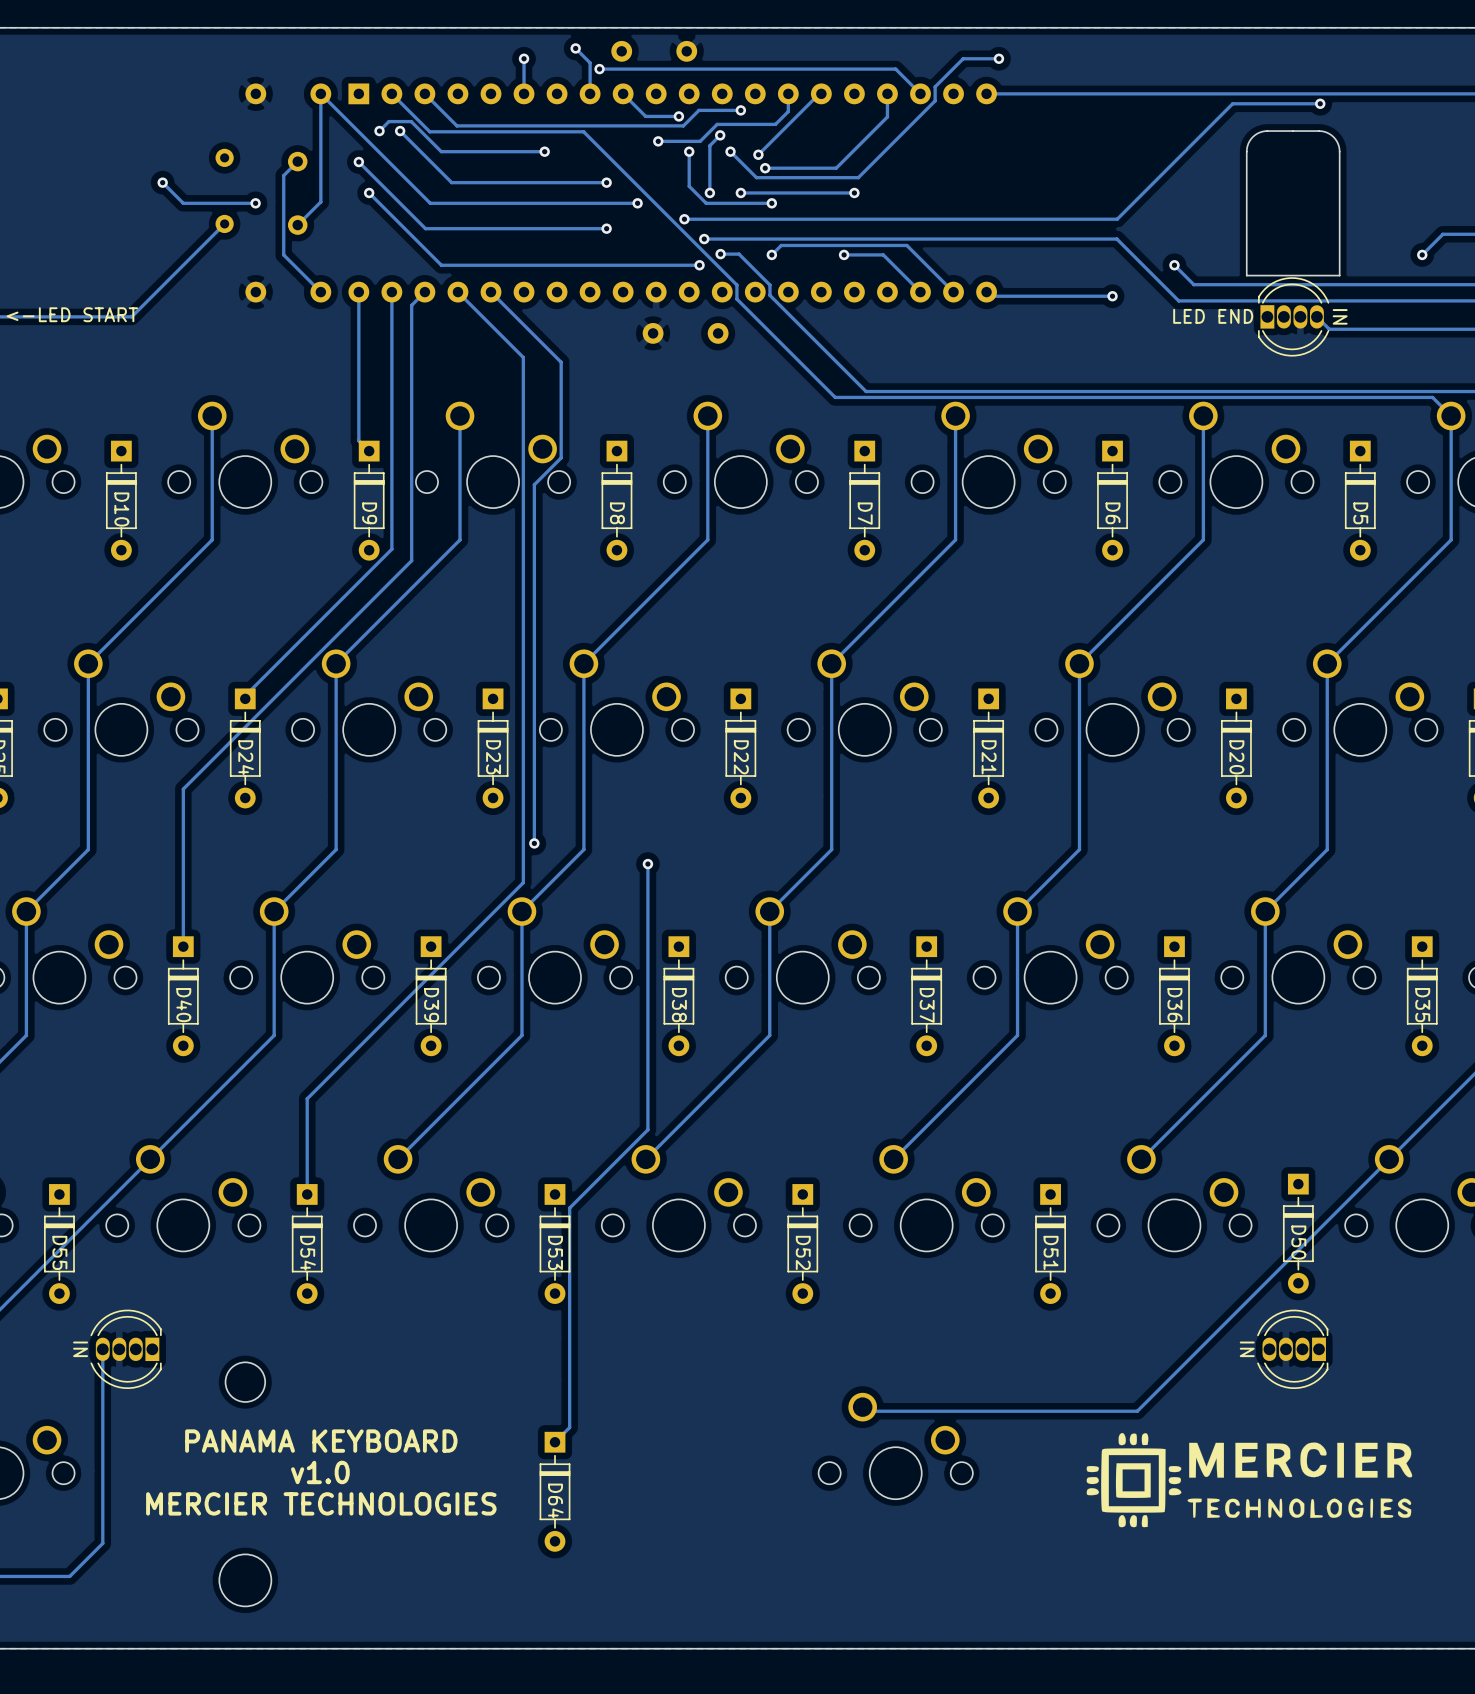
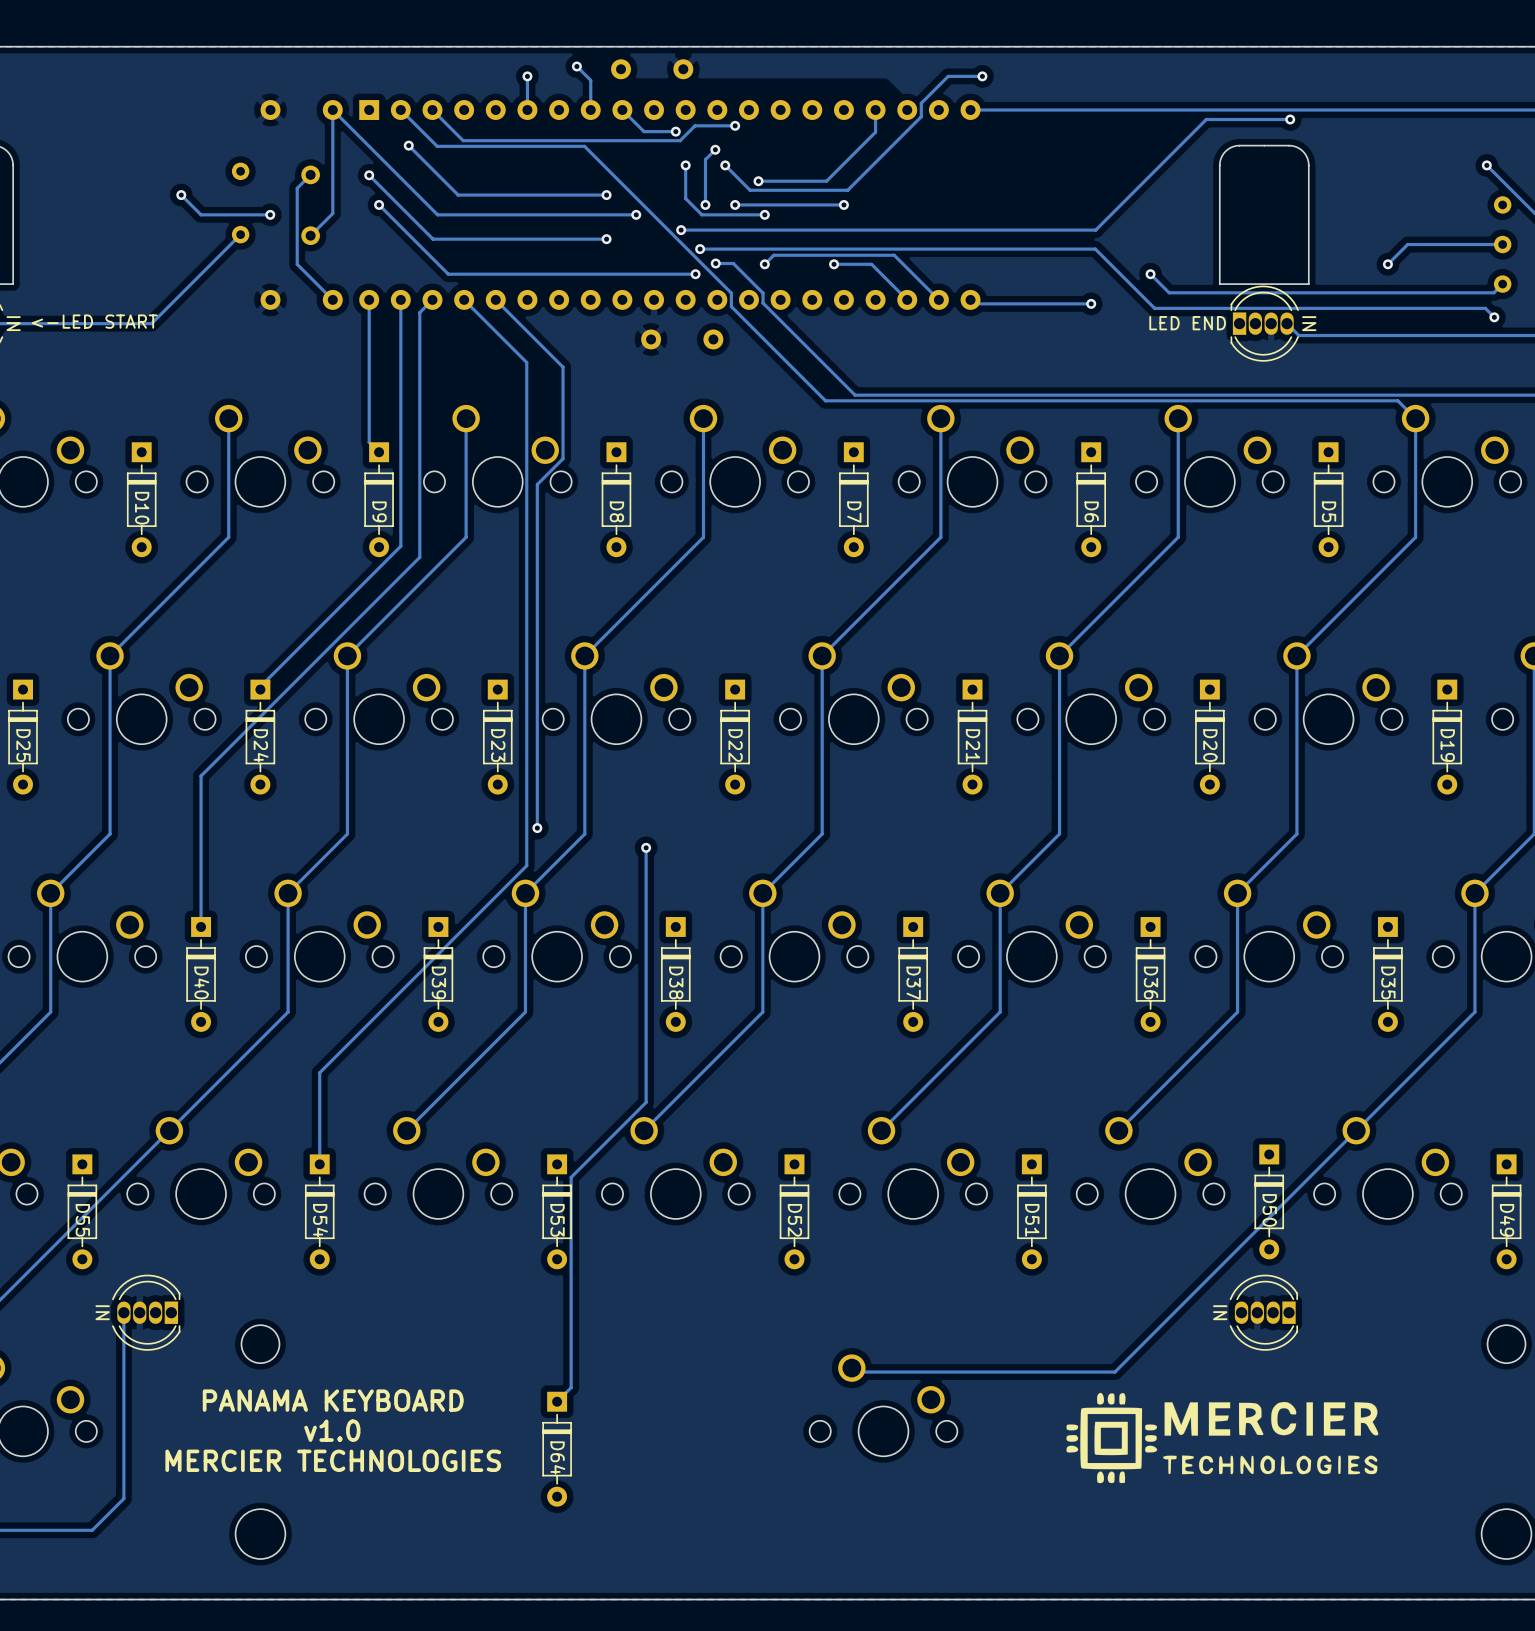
track: (599, 69) (895, 69) (920, 93) -> none
via: (599, 69) -> none
track: (788, 93) (788, 111) (775, 124) (717, 124) (700, 141) (658, 141) -> none
track: (821, 93) (758, 154) -> none
track: (379, 131) (388, 121) (411, 121) (441, 151) (544, 151) -> none
via: (379, 131) -> none
via: (658, 141) -> none
via: (544, 151) -> none
via: (758, 154) -> none

